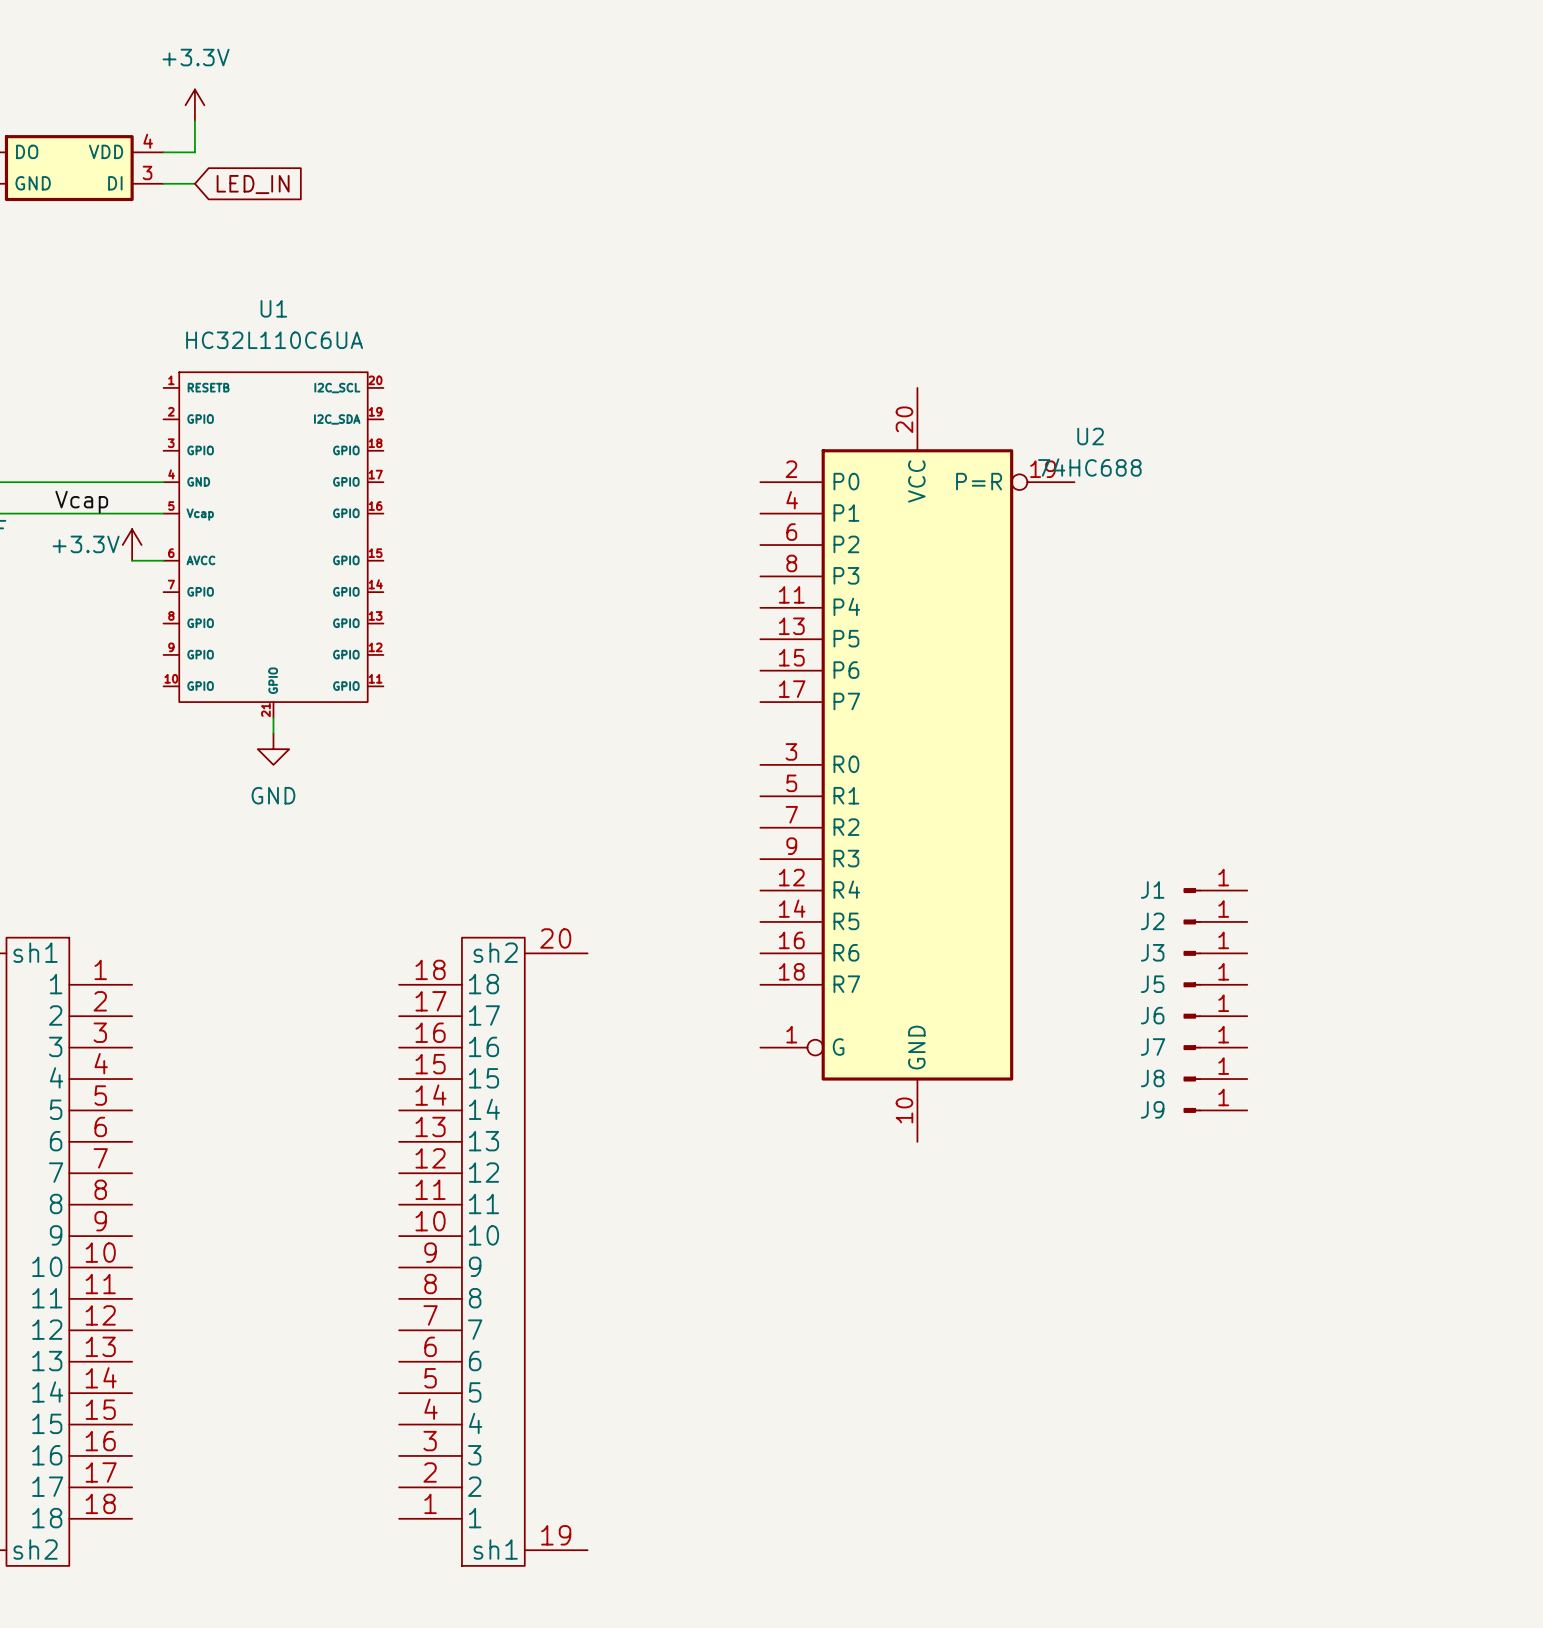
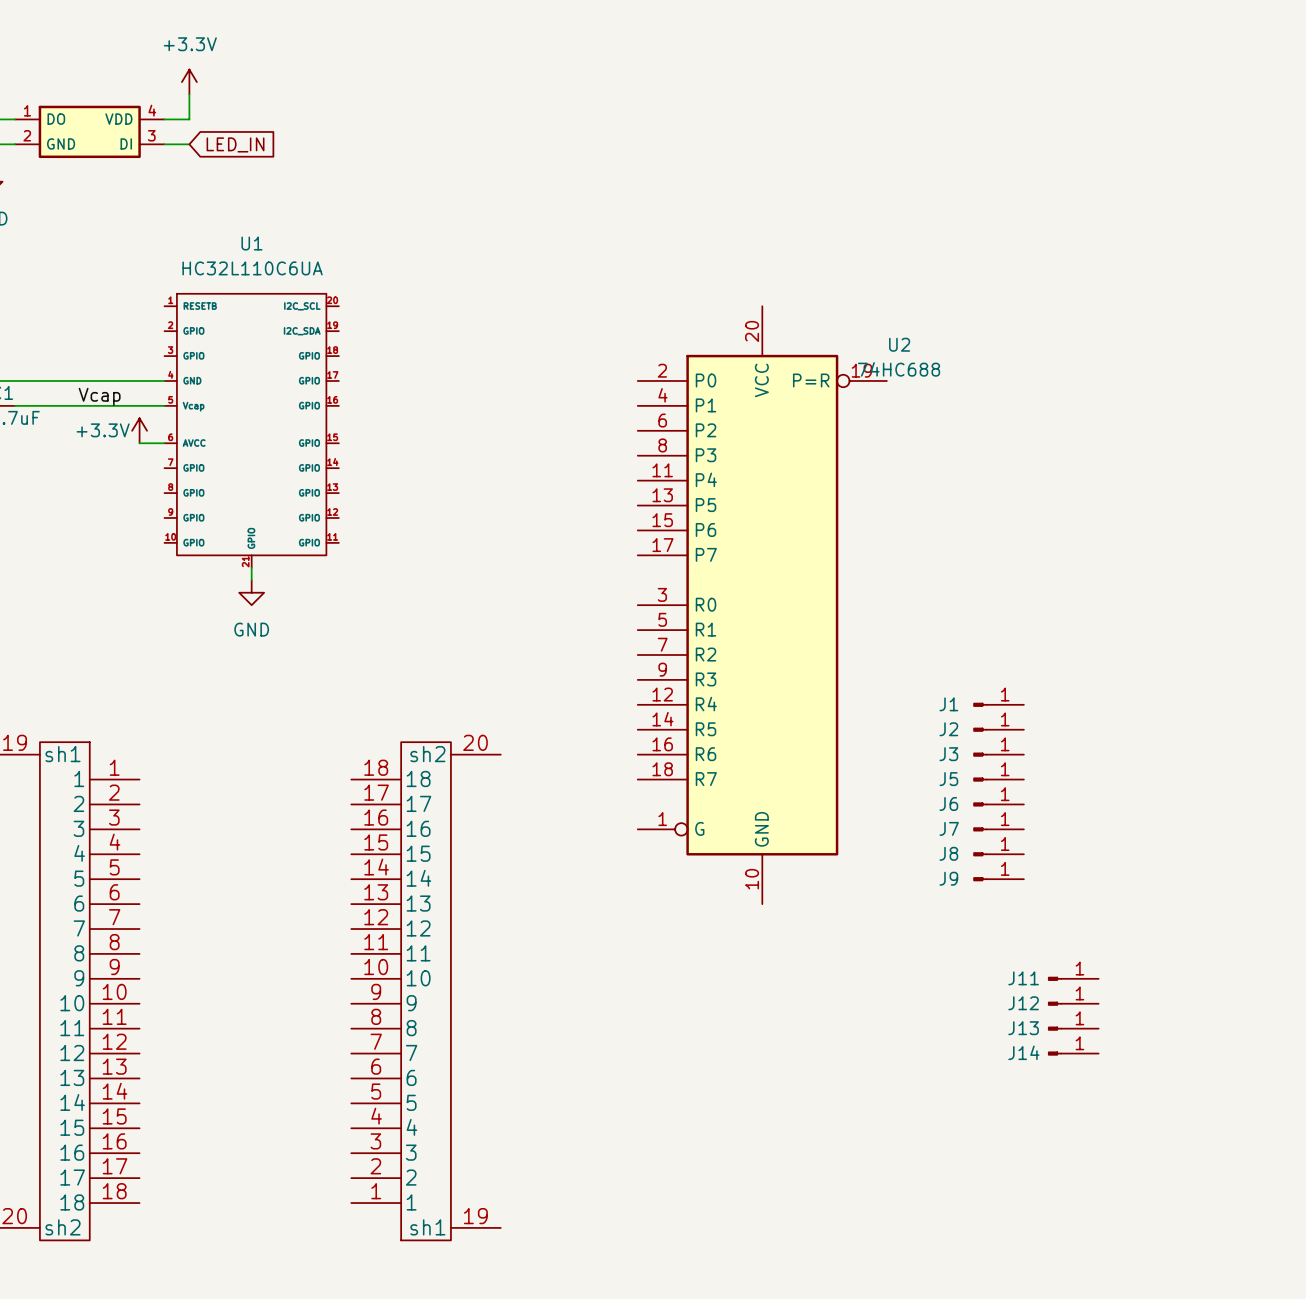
J11: none -> (1073, 978)
J12: none -> (1073, 1003)
J13: none -> (1073, 1028)
J14: none -> (1073, 1053)

